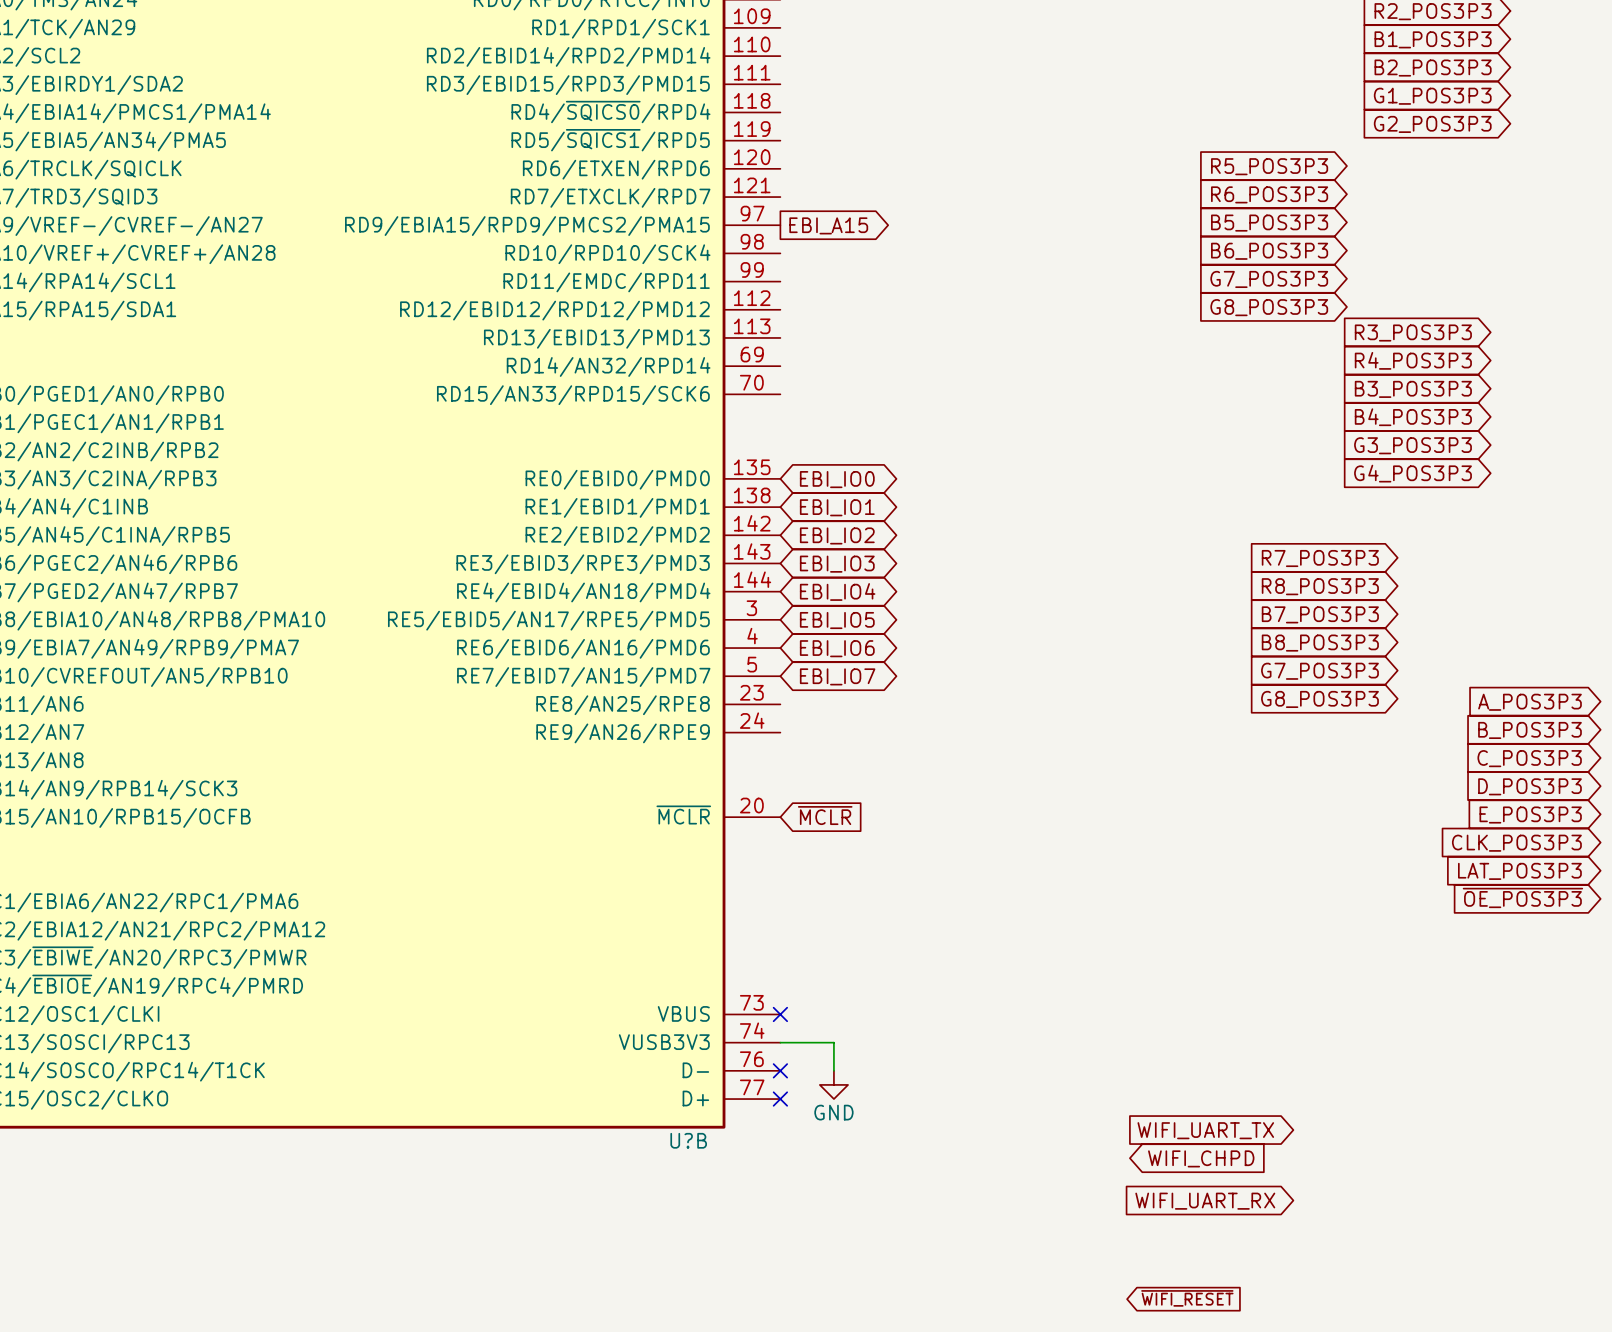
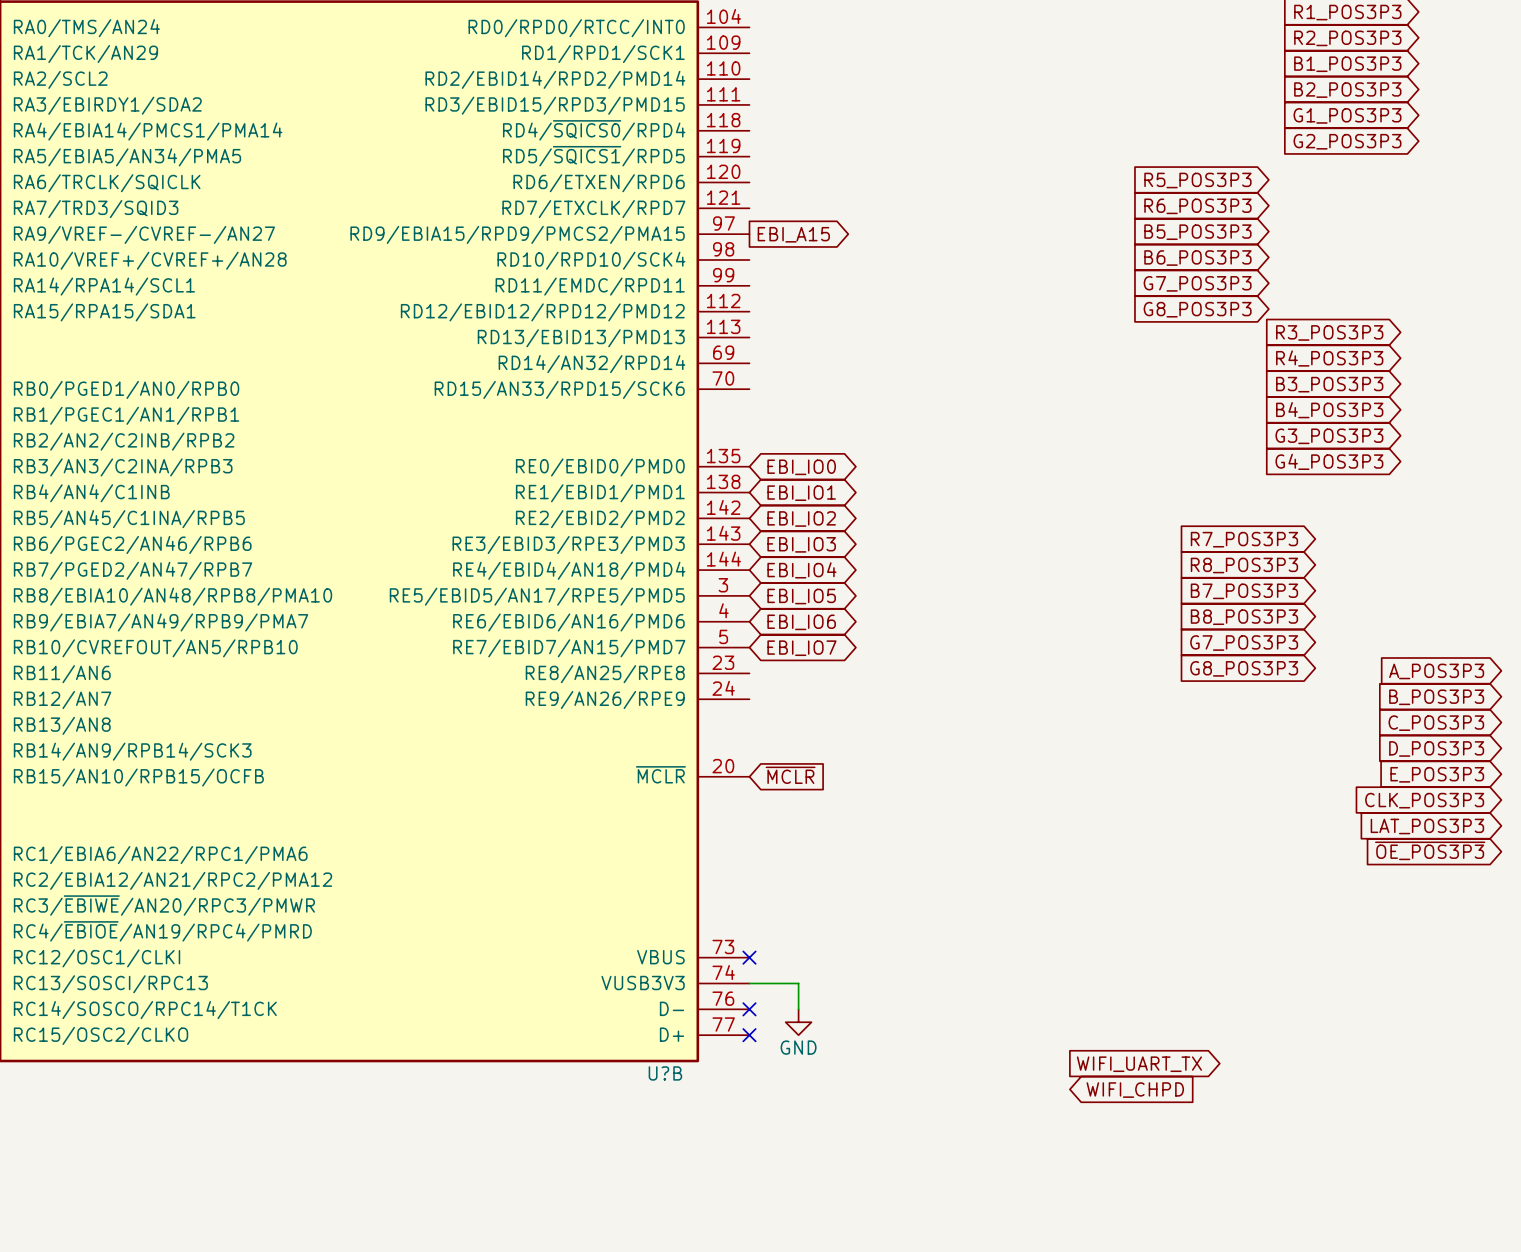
global label: WIFI_UART_RX (1205, 1201) -> none
global label: ~{WIFI_RESET} (1187, 1298) -> none

